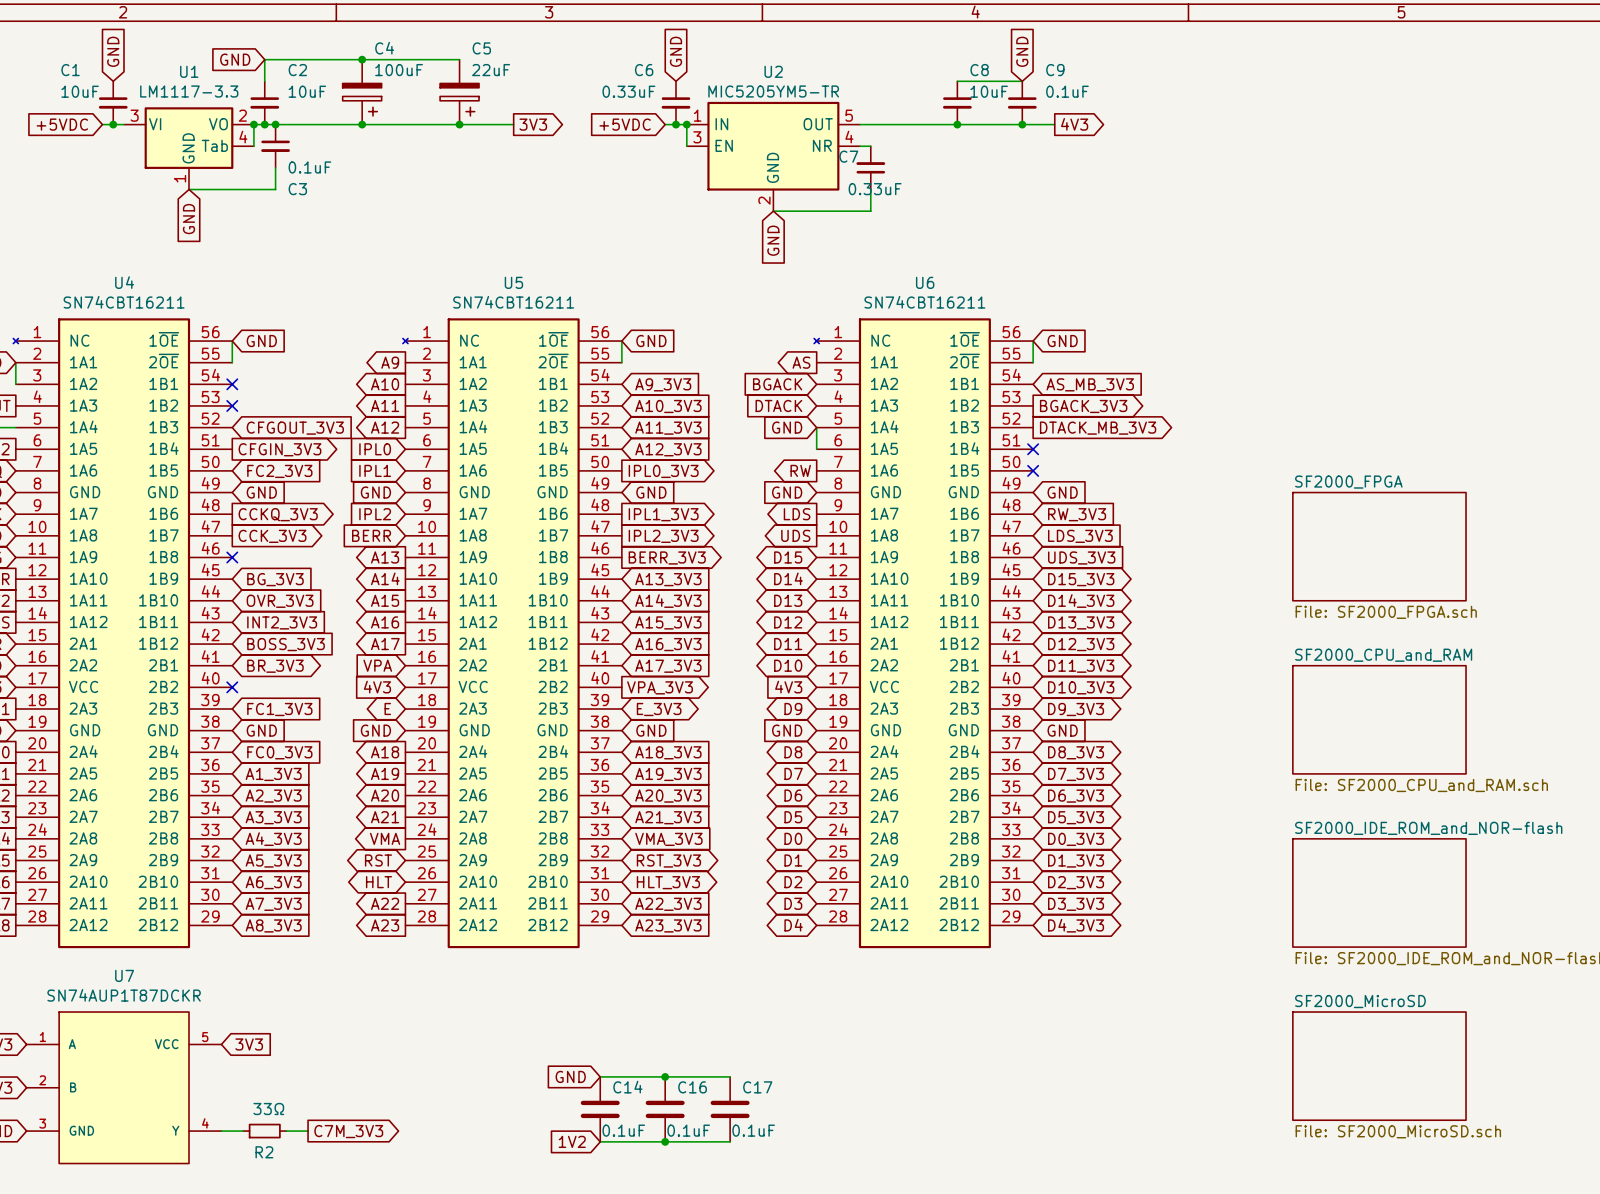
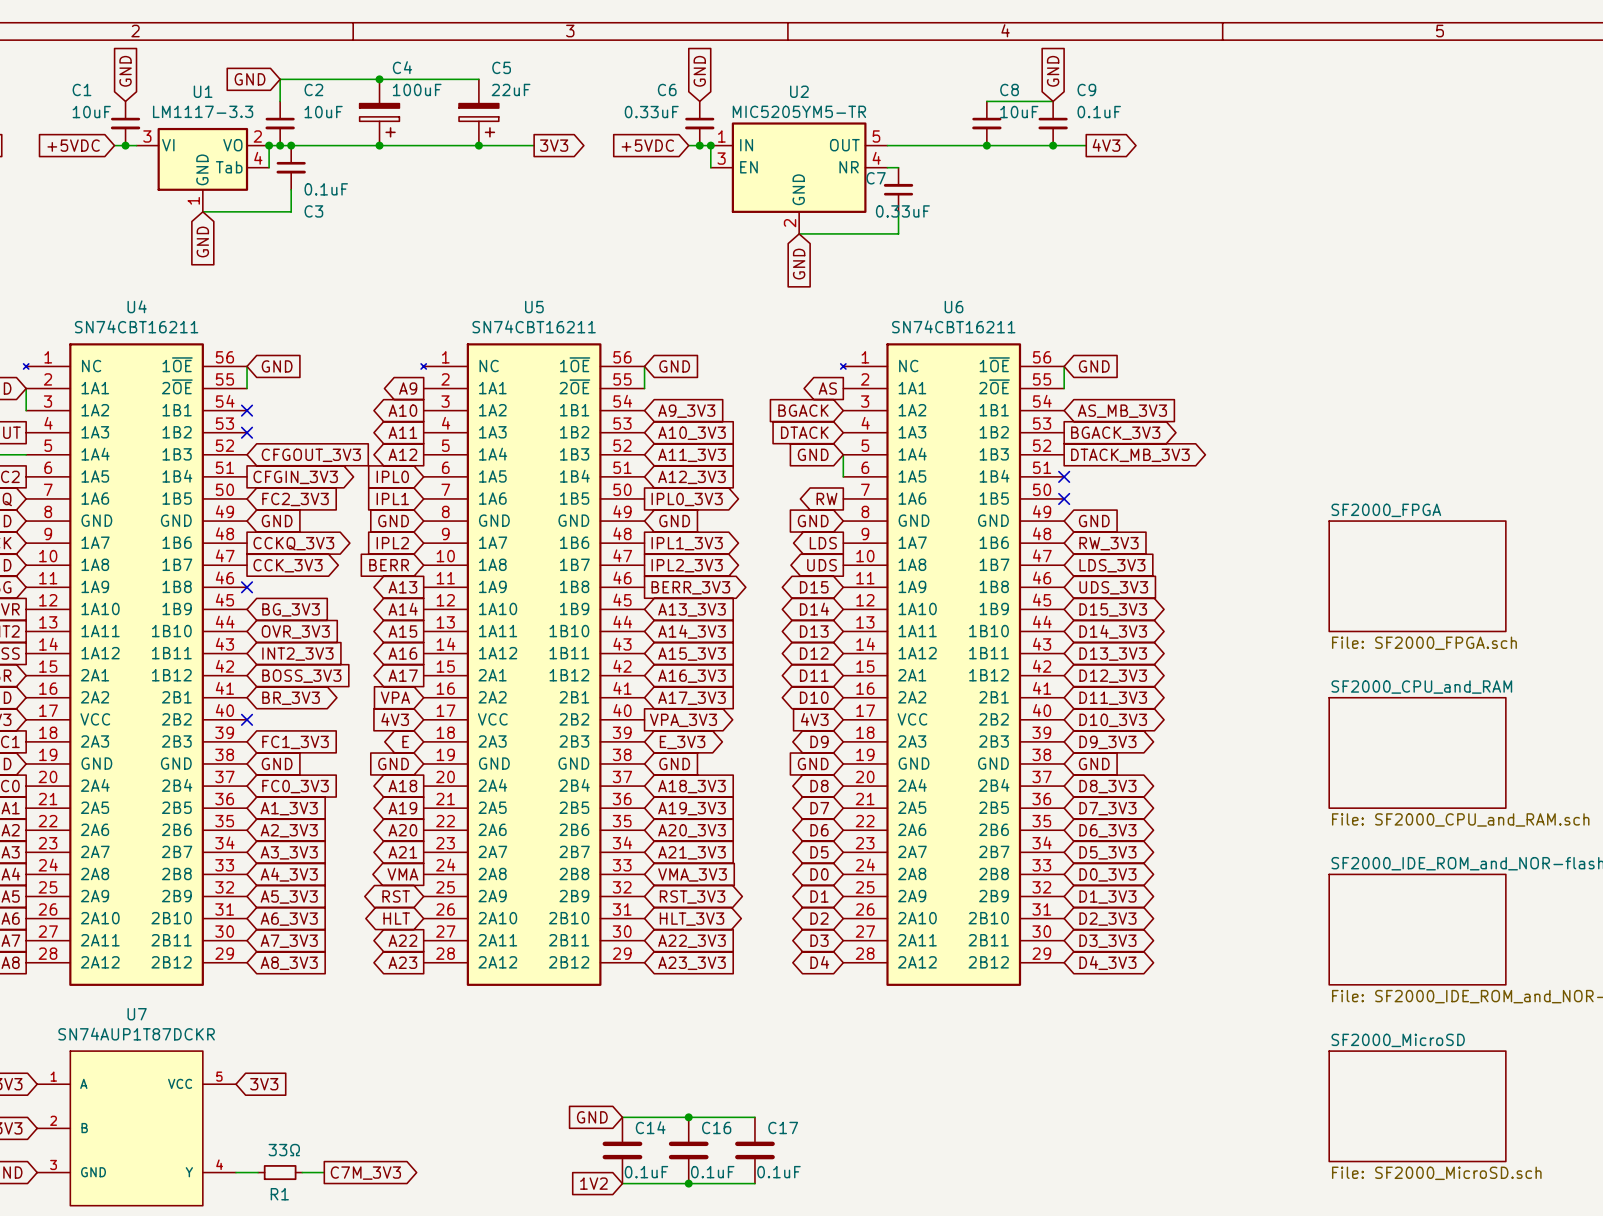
R2 name: R2 (264, 1152) -> R1 (279, 1194)

